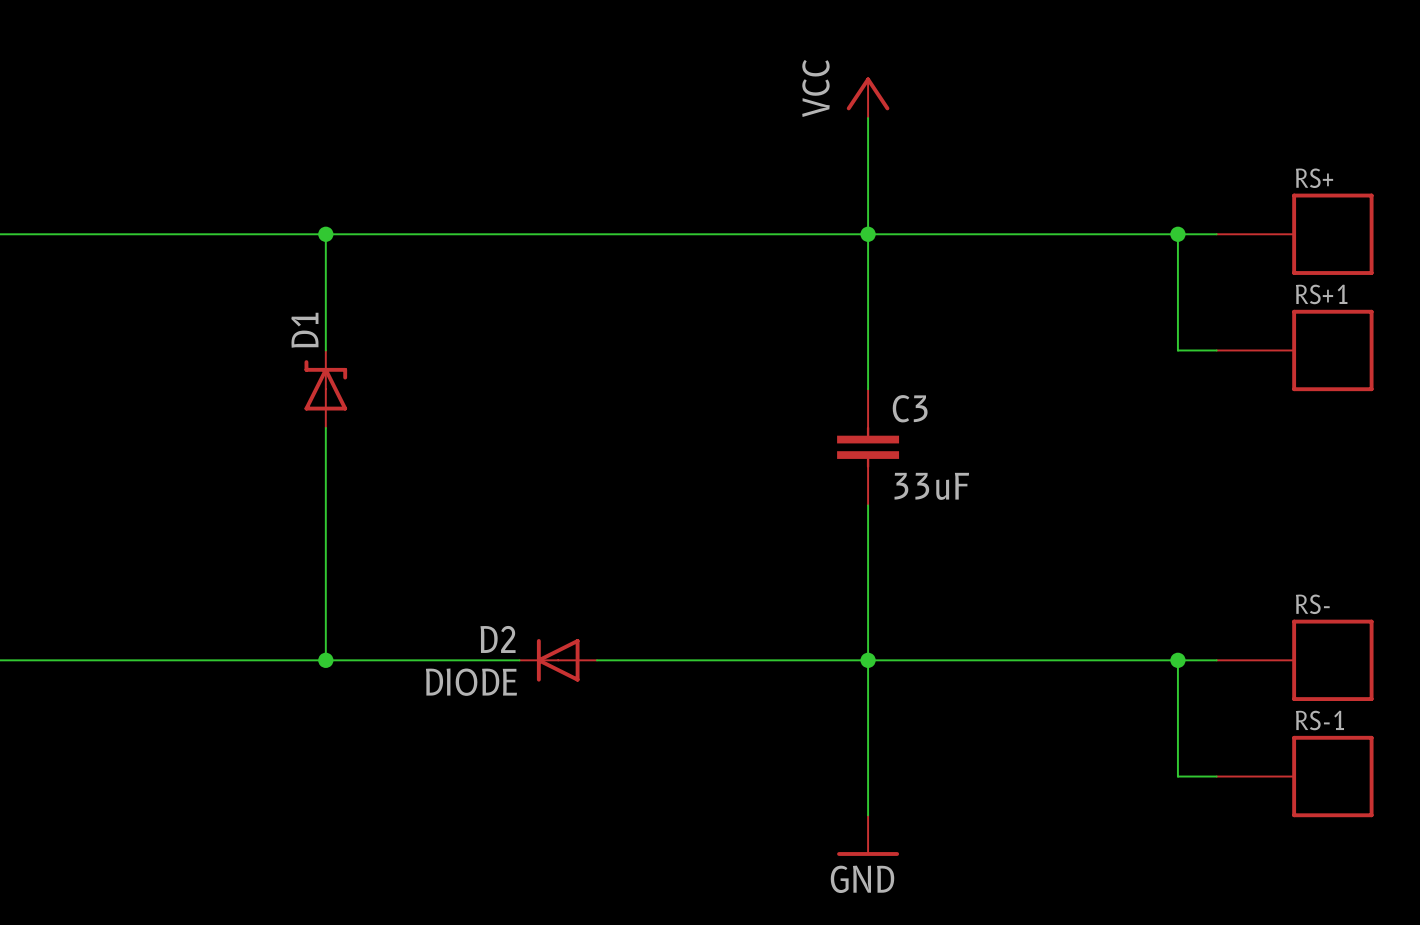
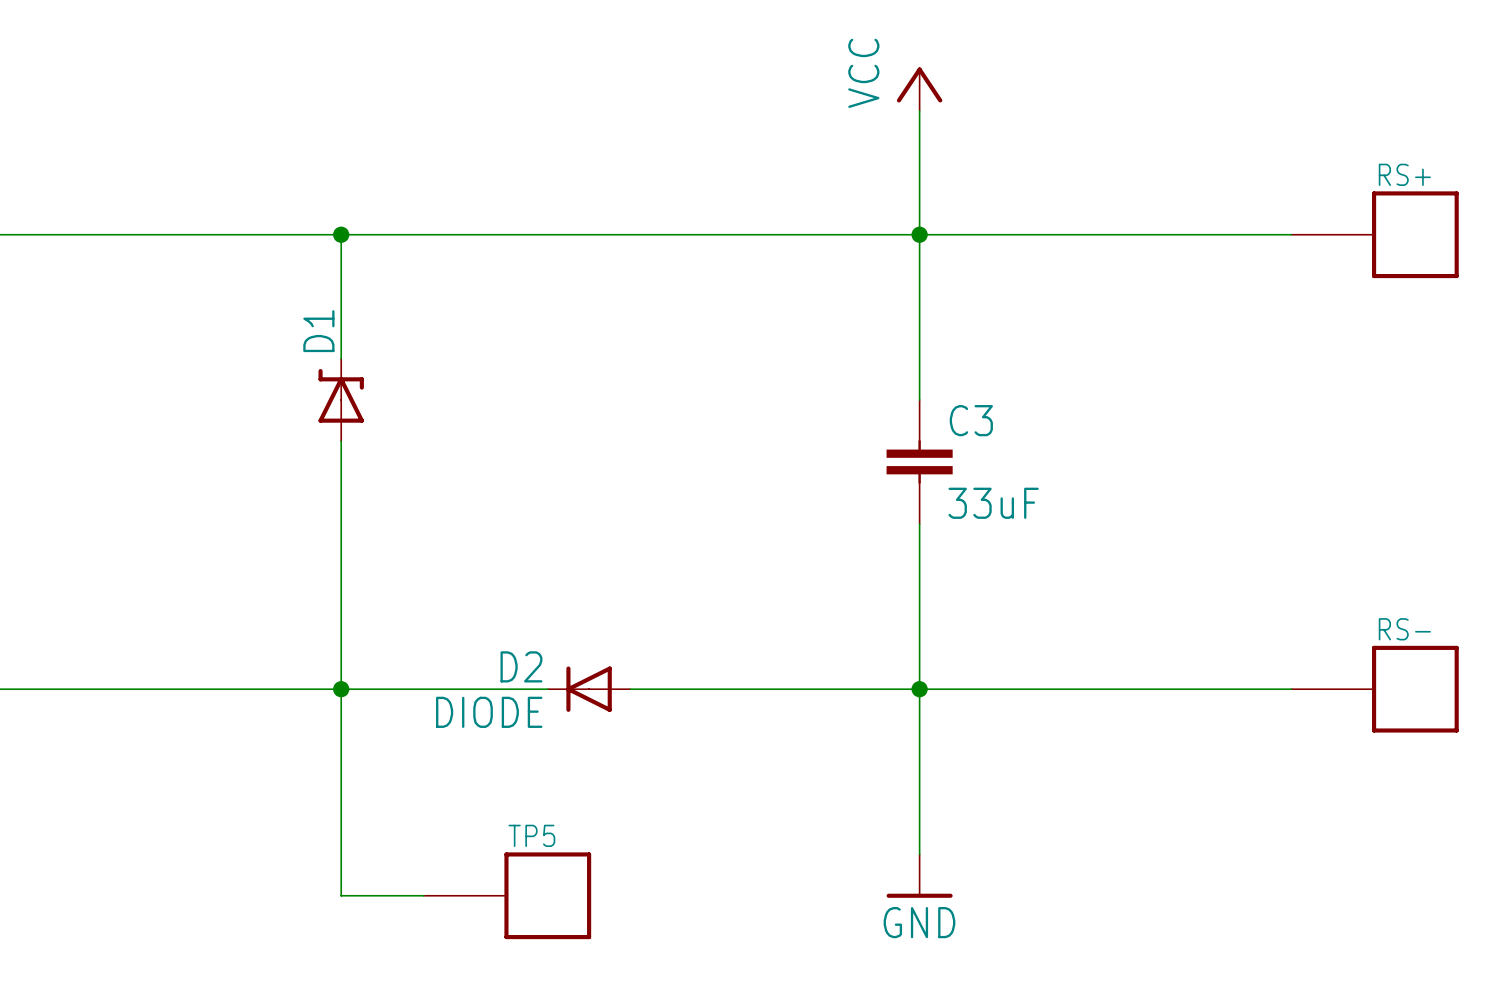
wire: (1177, 234) (1177, 350) (1216, 350) -> none
junction: (1177, 234) -> none
RS+1: (1295, 350) -> none
wire: none -> (341, 689) (341, 895) (423, 895)
wire: (1177, 660) (1177, 776) (1216, 776) -> none
junction: (1177, 660) -> none
RS-1: (1295, 776) -> none
TP5: none -> (507, 895)

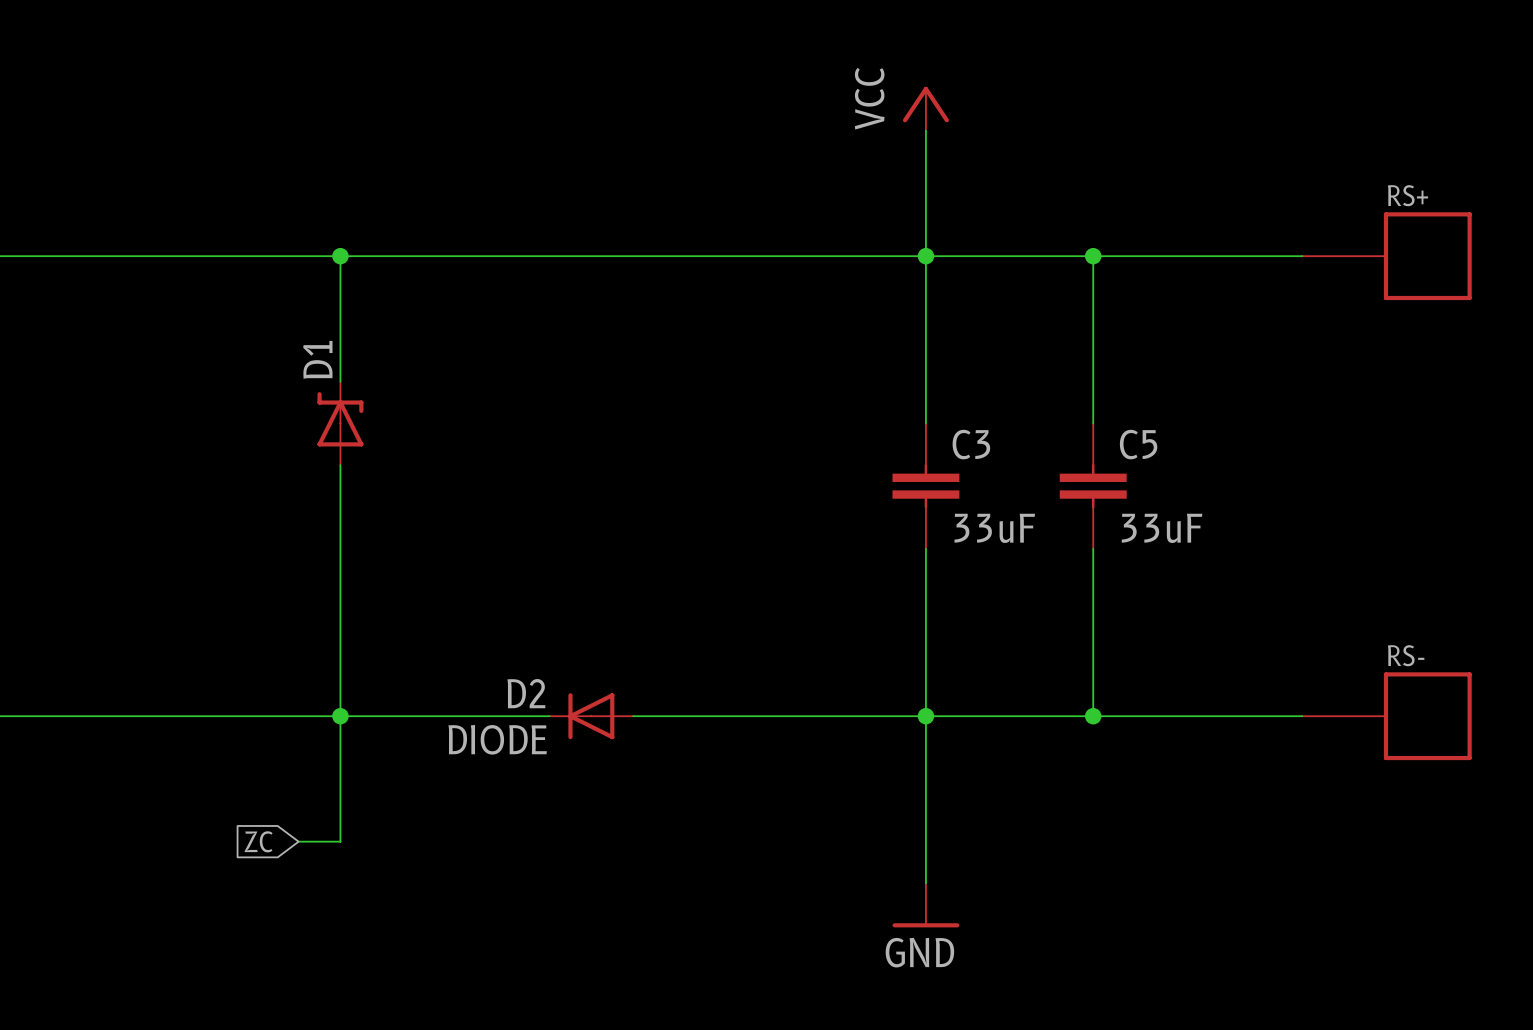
wire: none -> (1093, 256) (1093, 423)
junction: none -> (1093, 256)
C5: none -> 33uF (1093, 486)
wire: none -> (1093, 548) (1093, 716)
junction: none -> (1093, 716)
global label: none -> ZC (258, 841)
wire: (341, 813) (341, 895) (423, 895) -> (340, 841) (298, 841)
TP5: (507, 895) -> none

